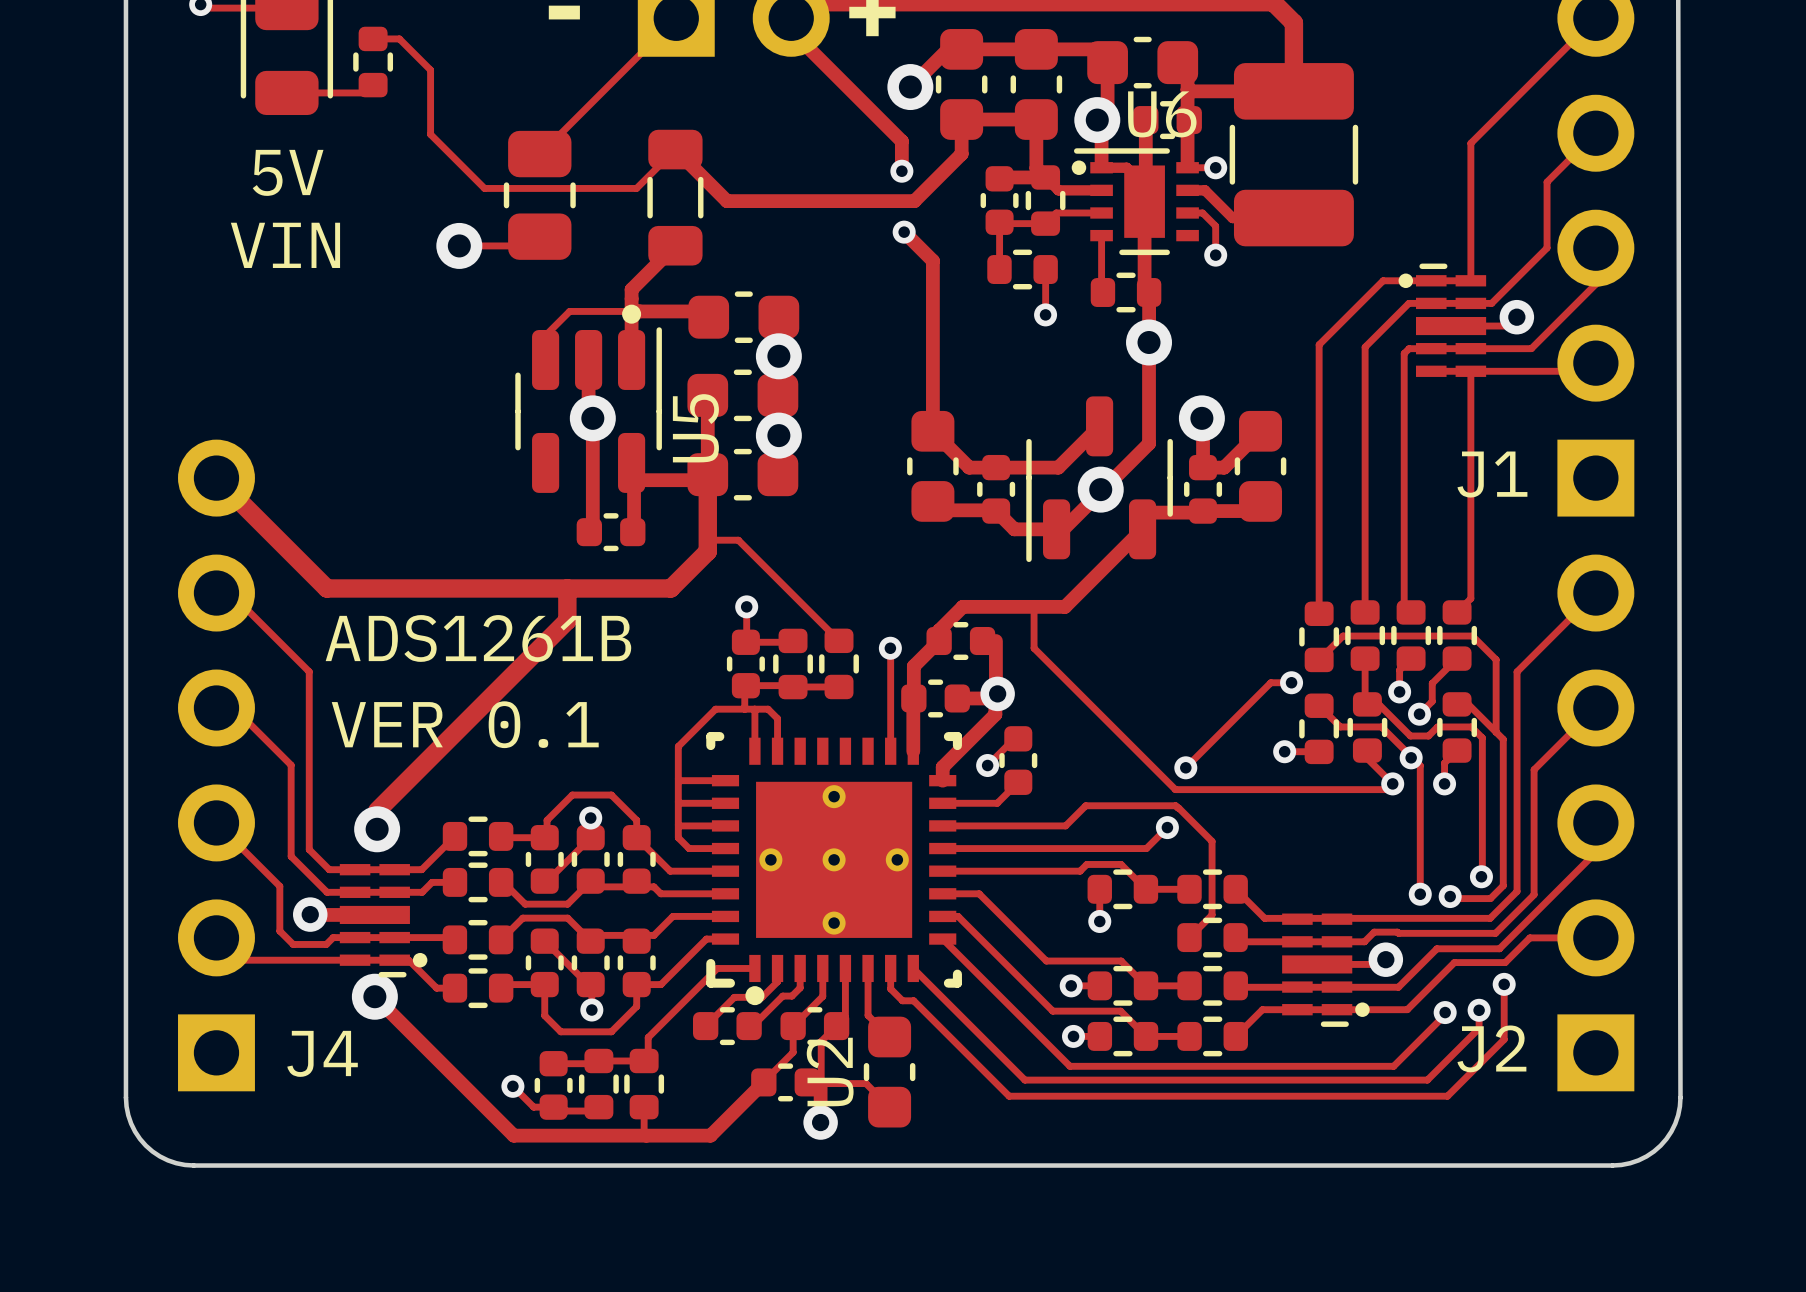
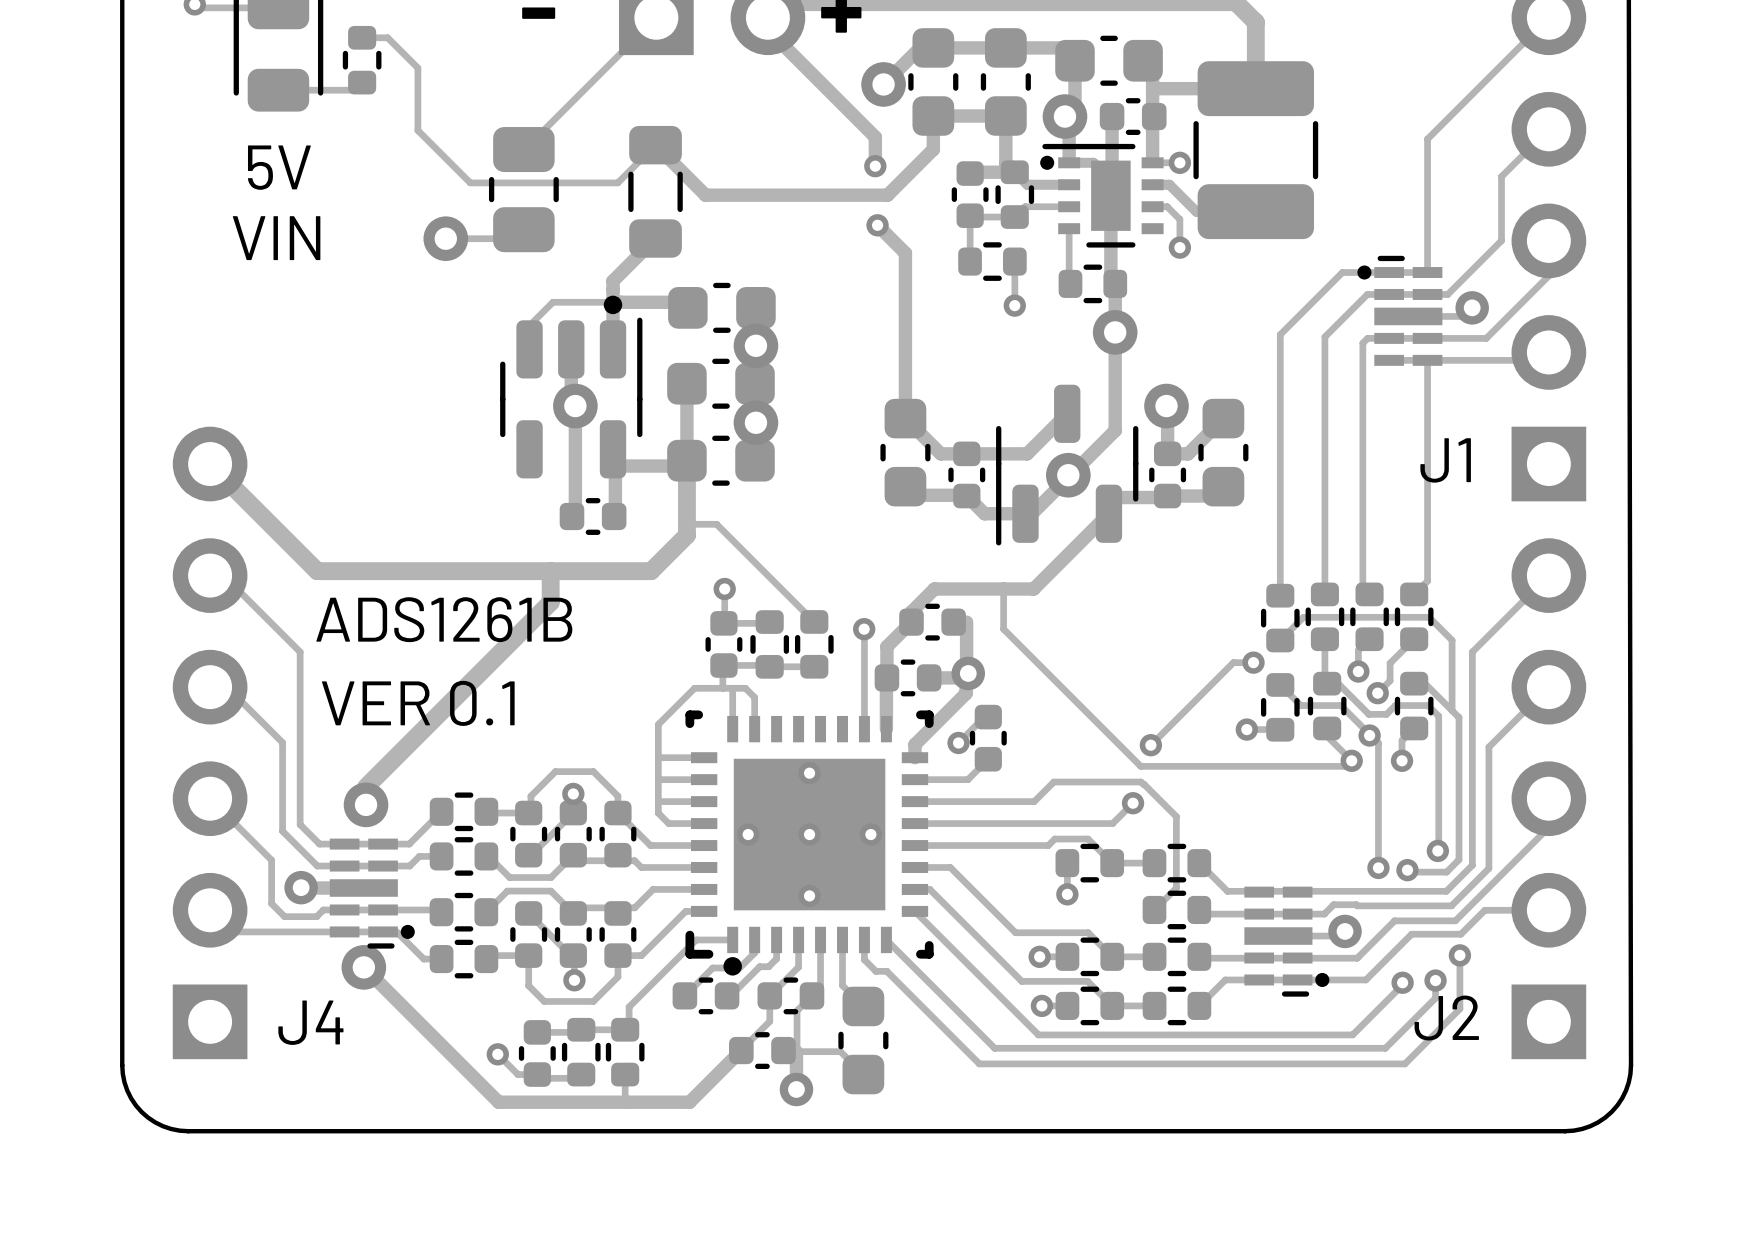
U6 name: U6 (1162, 114) -> none
U5 name: U5 (695, 428) -> none
U2 name: U2 (830, 1072) -> none

